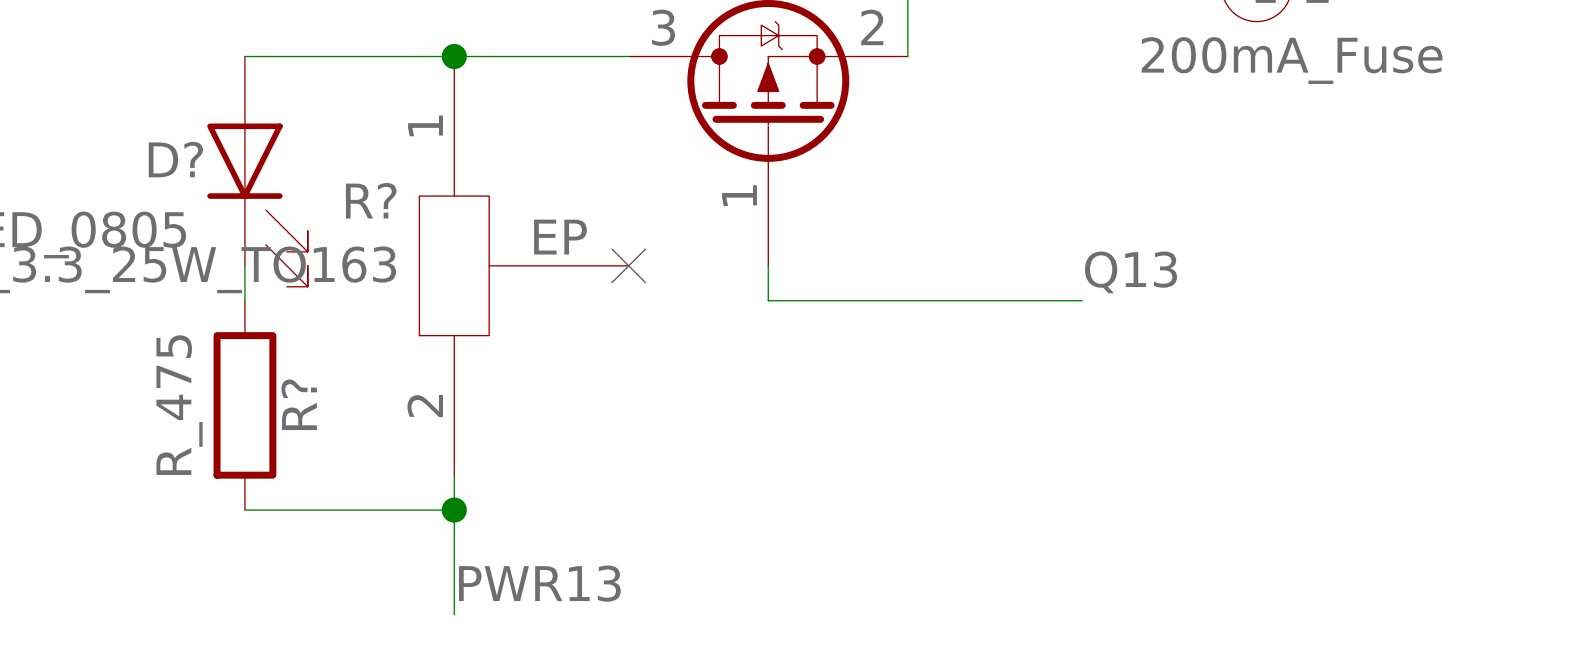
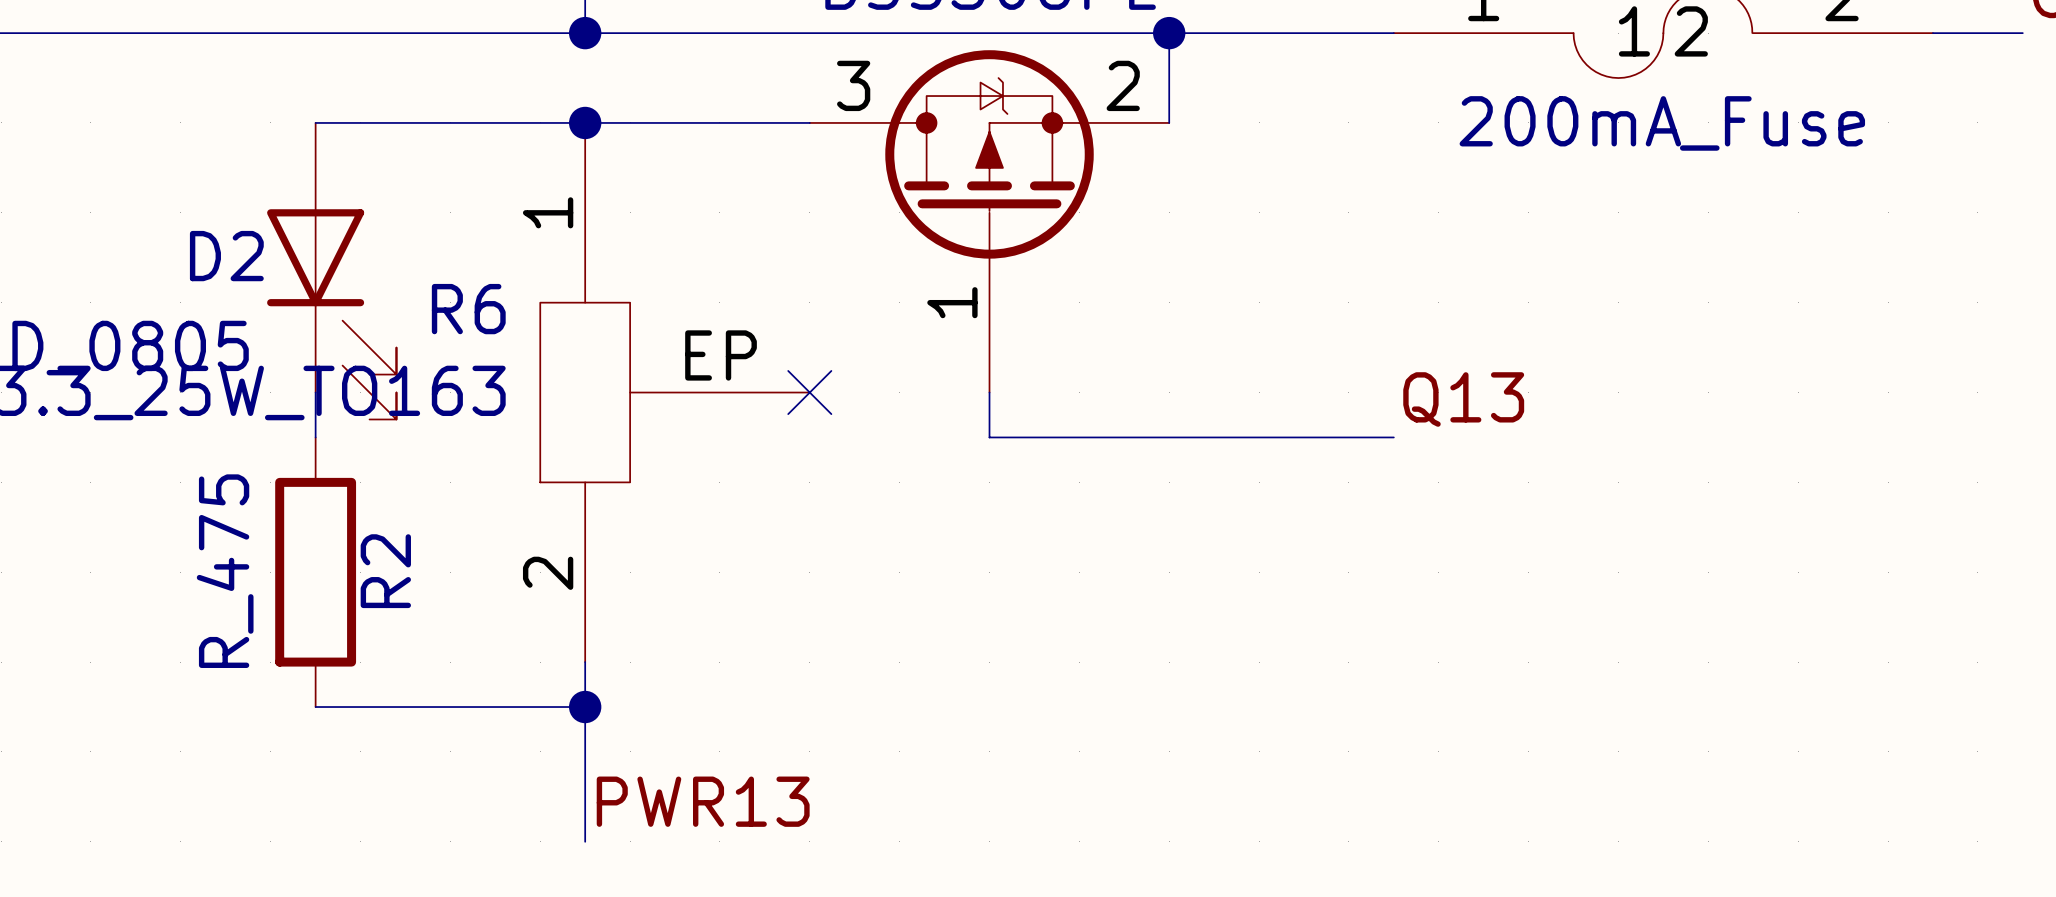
D? name: D? (175, 159) -> D2 (226, 256)
R? name: R? (371, 200) -> R6 (468, 309)
R? name: R? (299, 404) -> R2 (385, 571)

